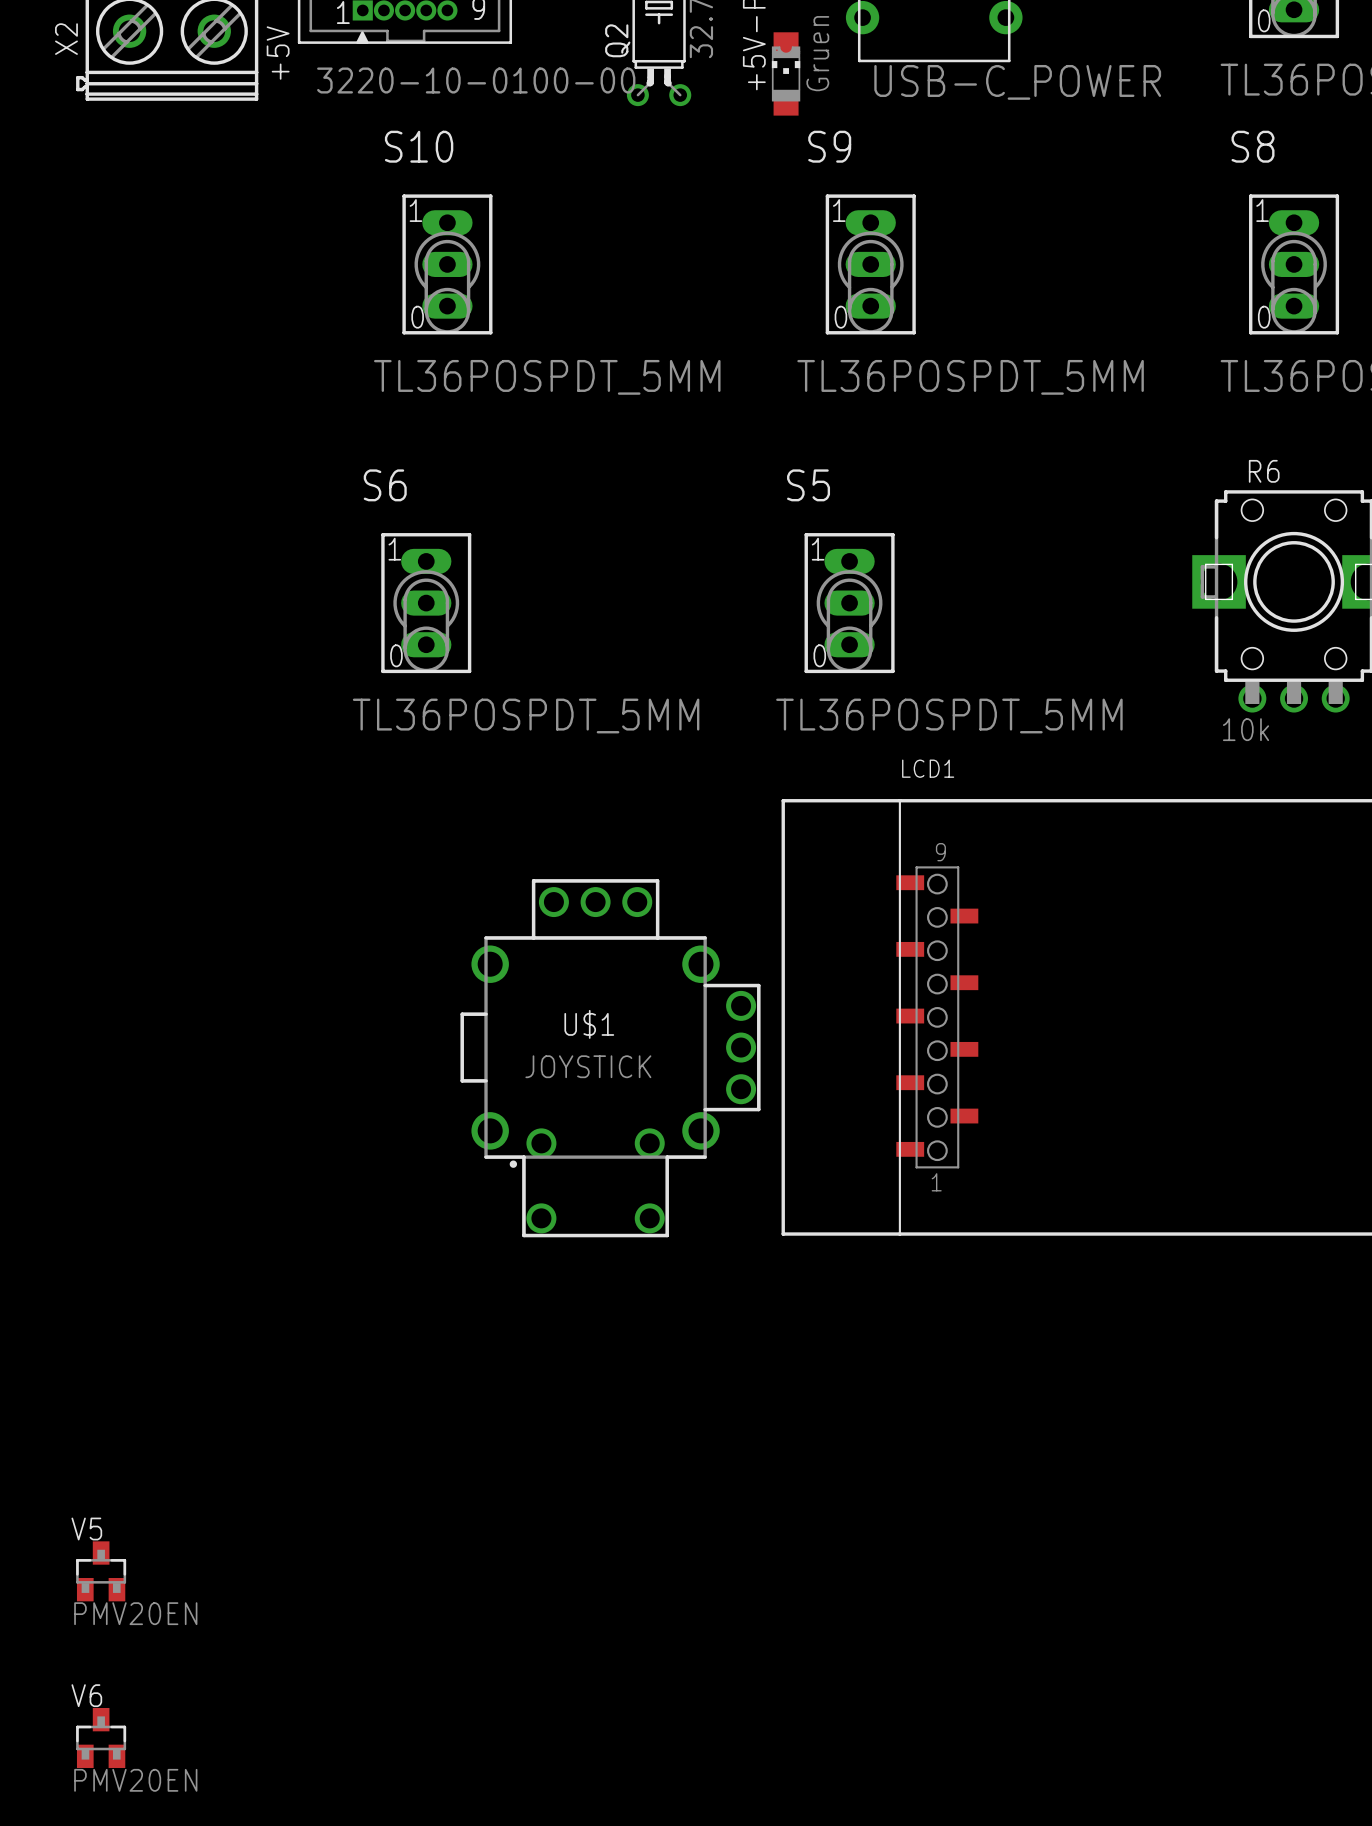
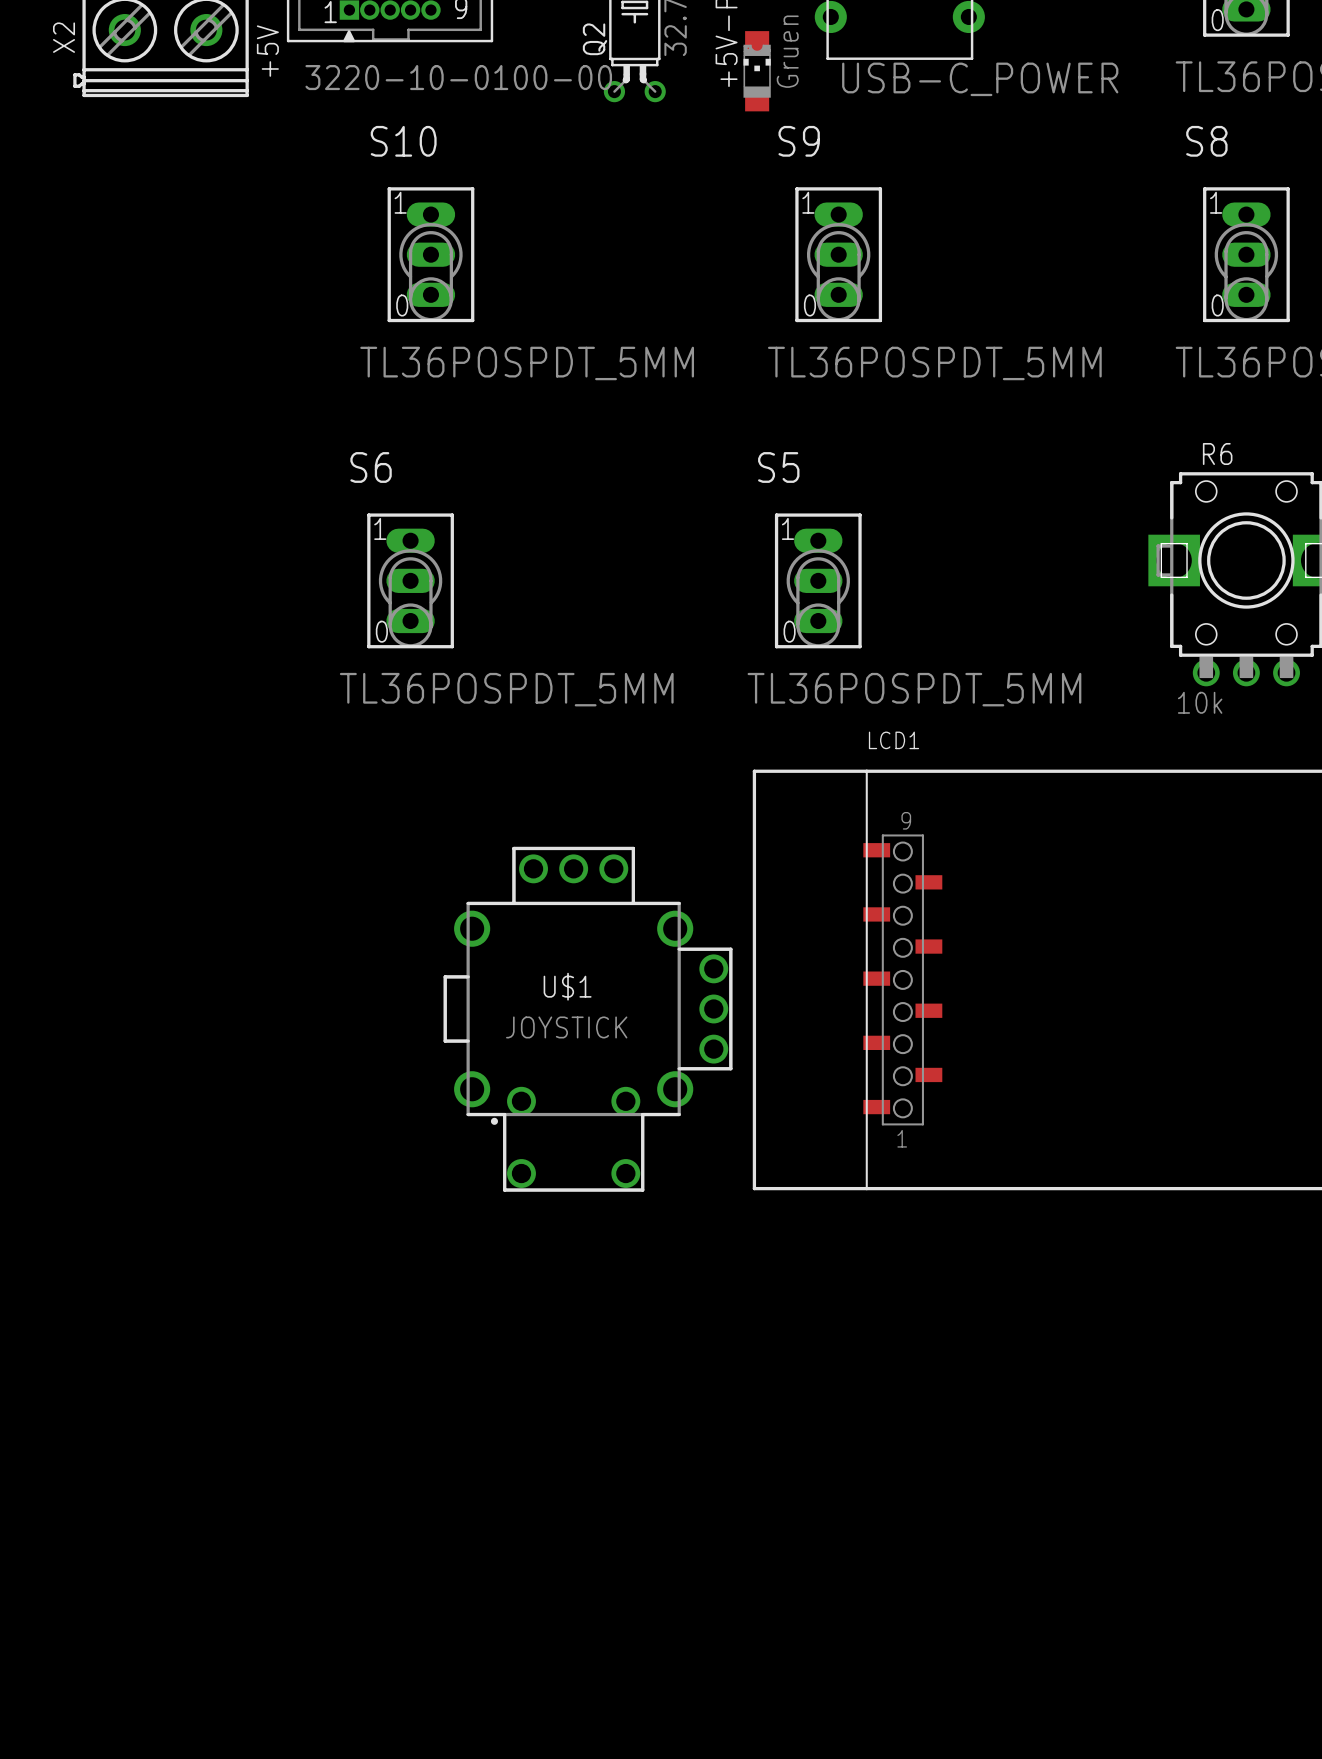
V5: PMV20EN (101, 1571) -> none
V6: PMV20EN (101, 1737) -> none

